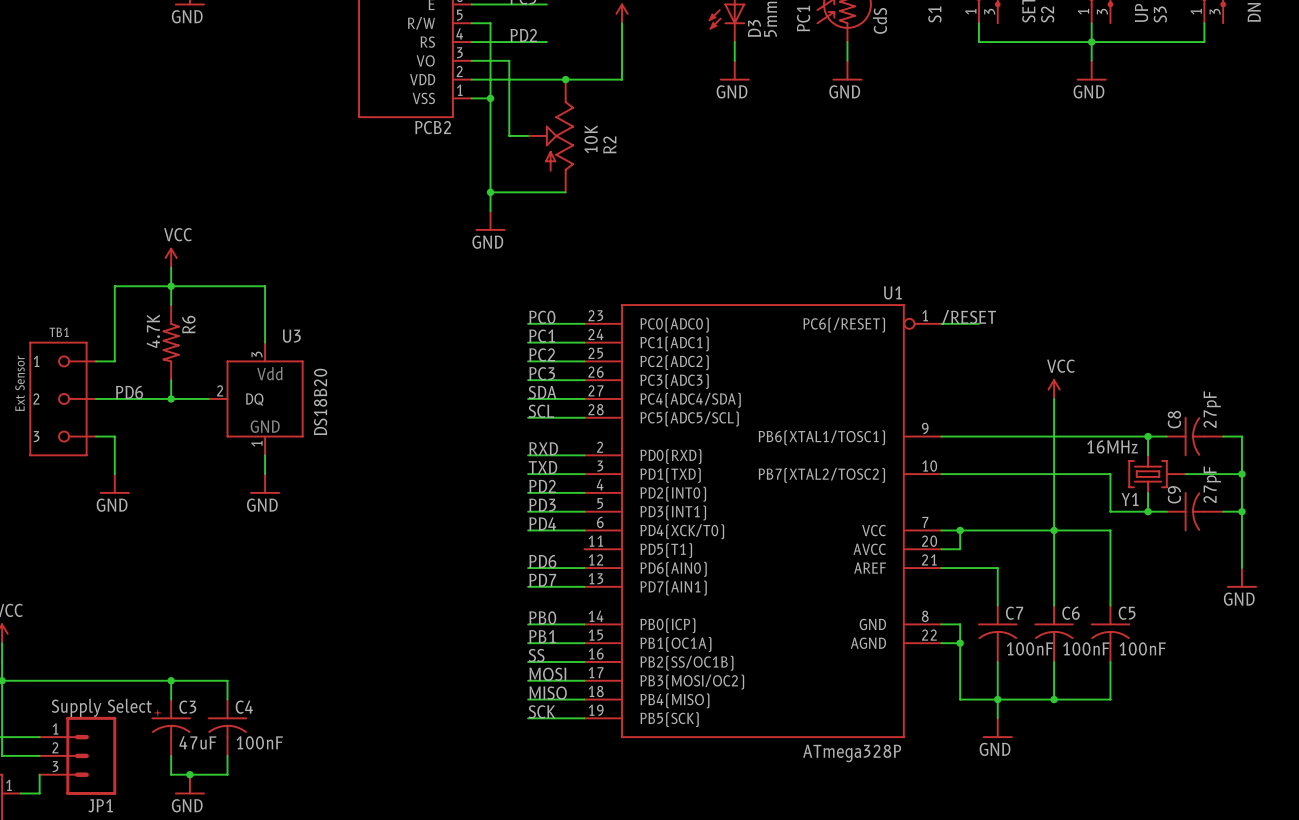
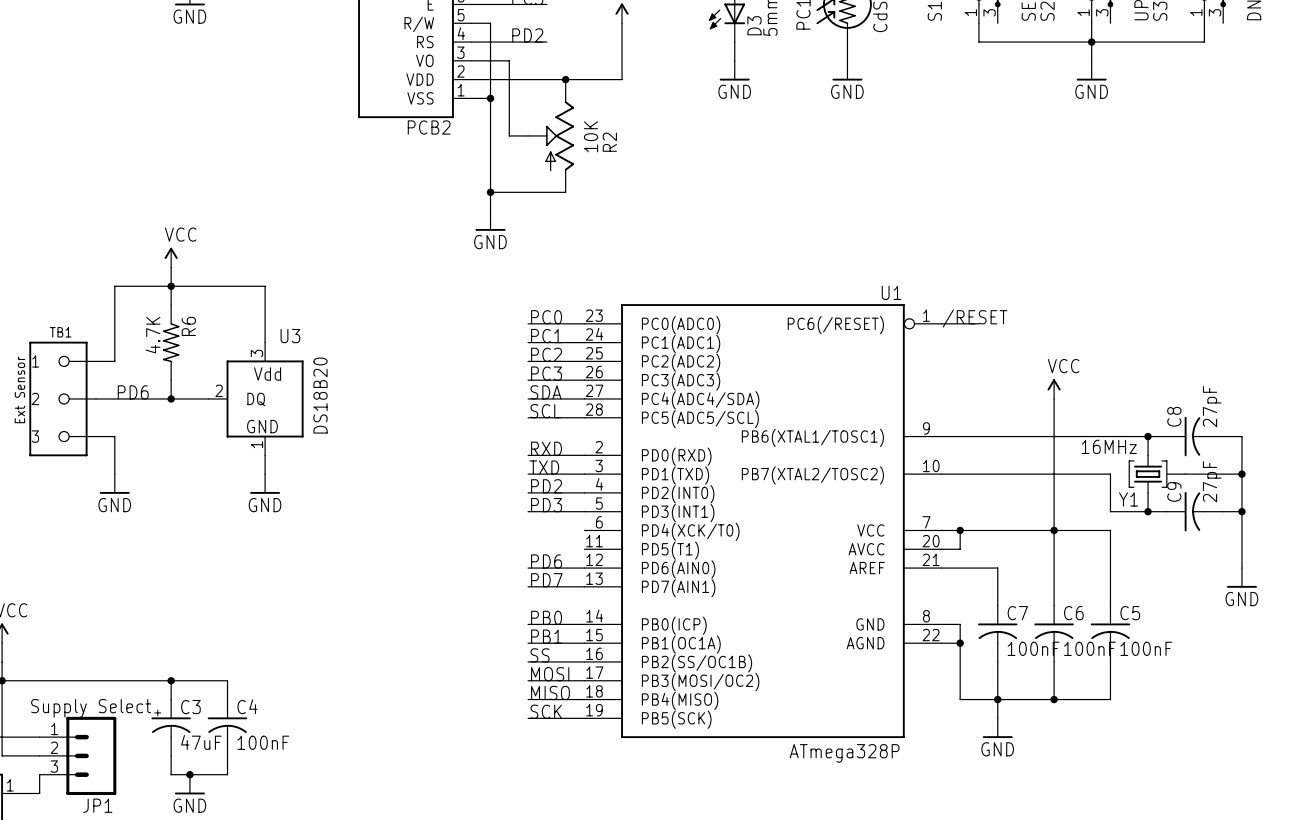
label: PD4 (542, 523) -> none
wire: (528, 530) (584, 530) -> none

